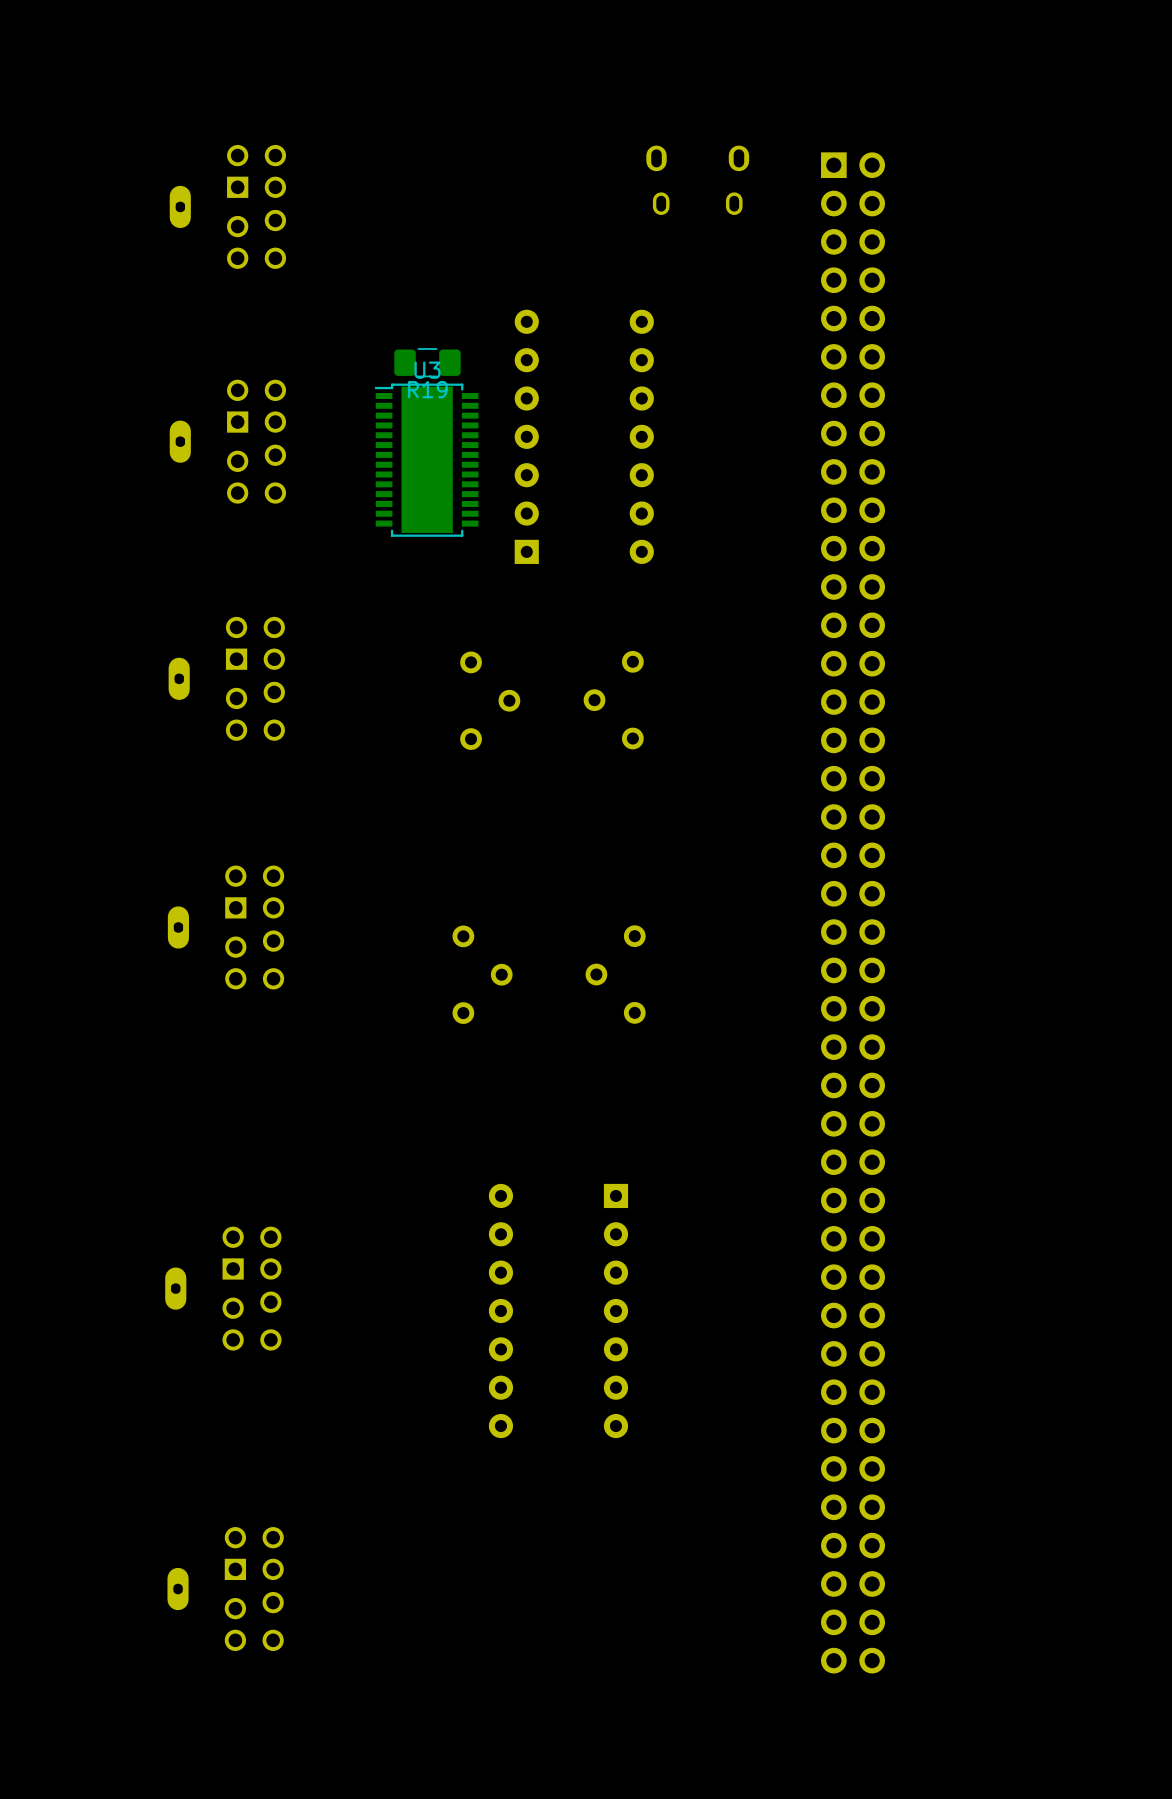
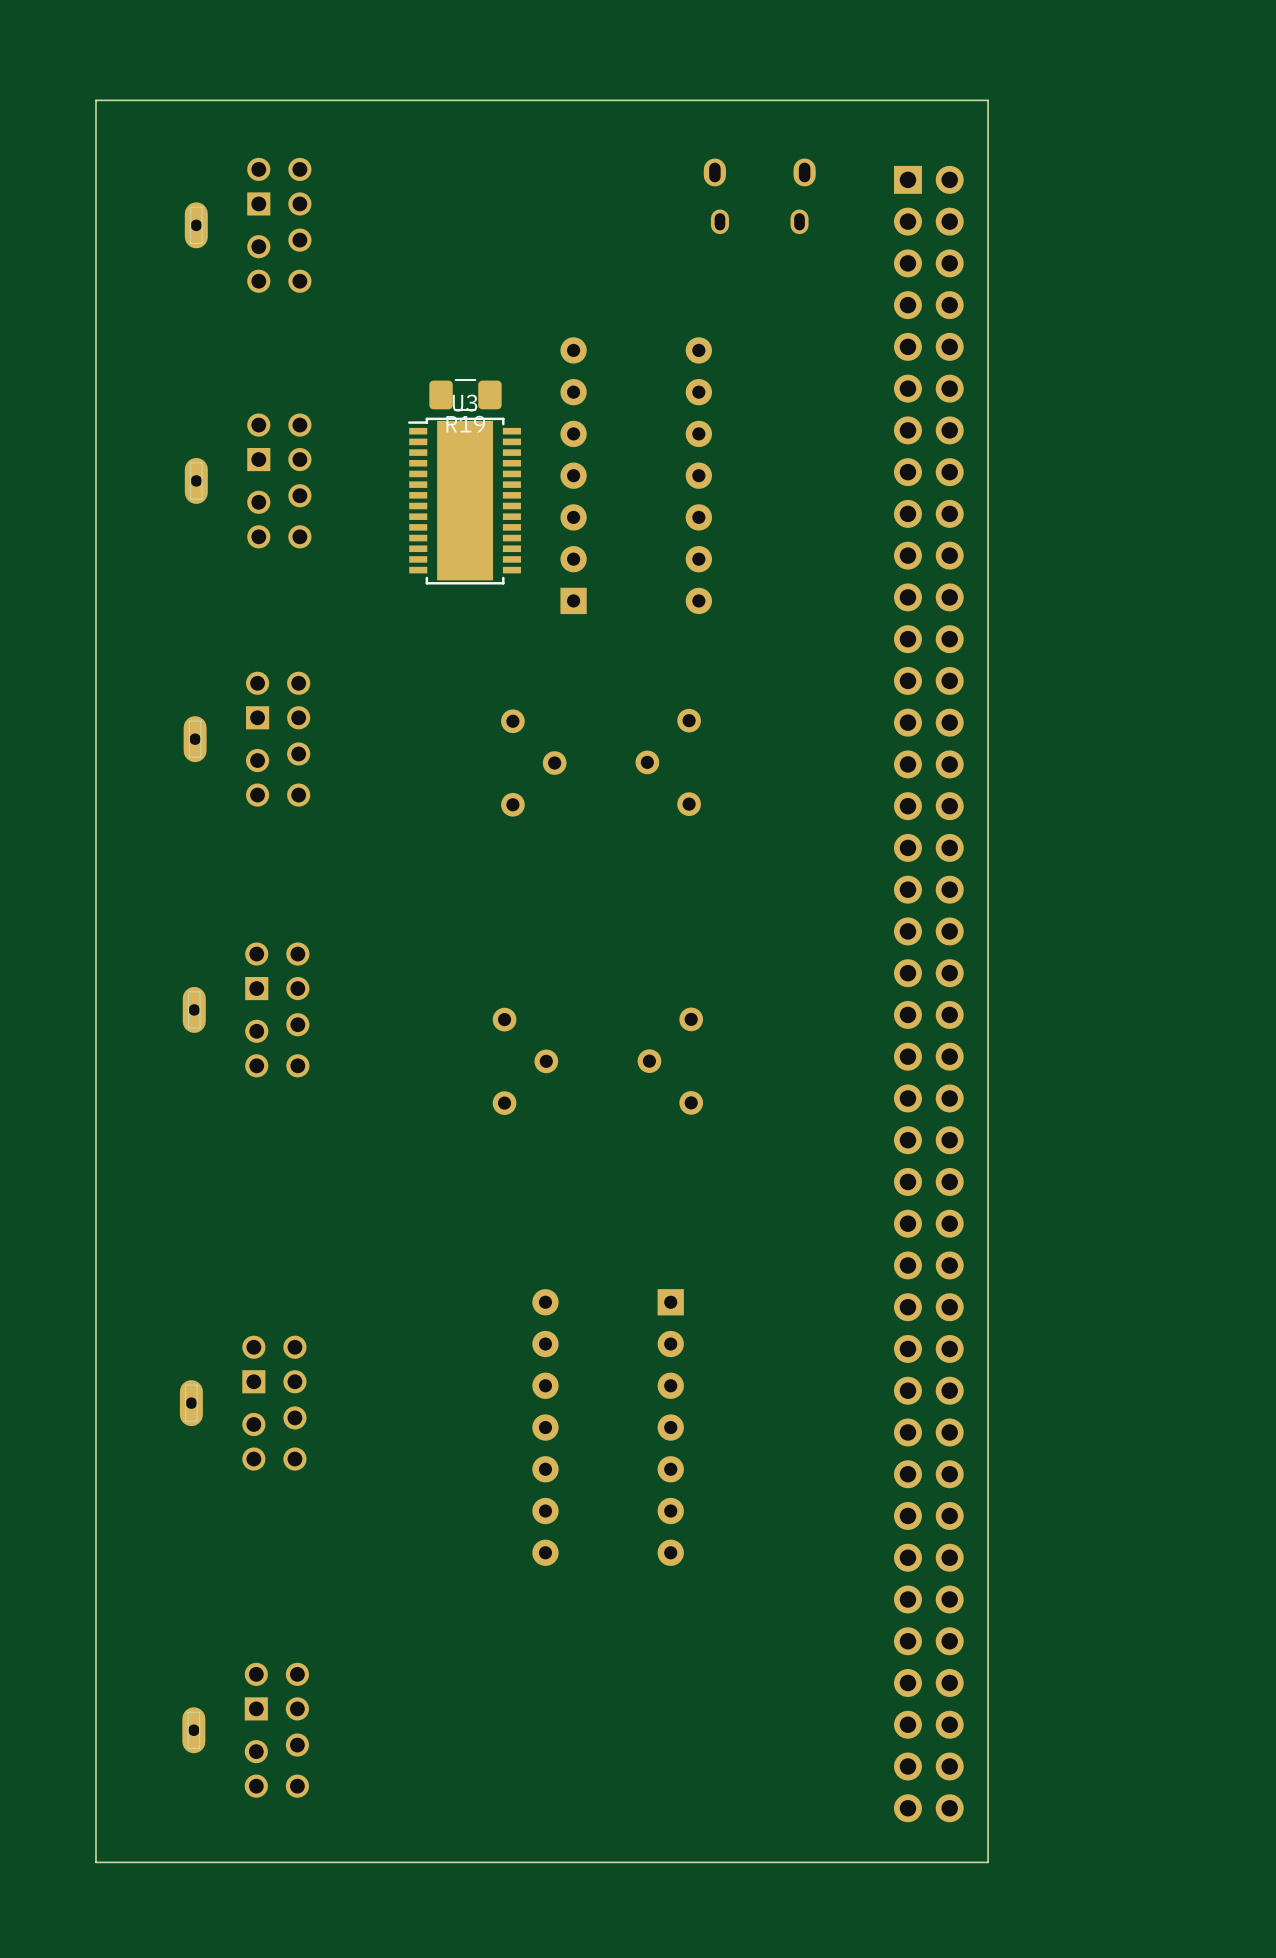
board edge: none -> (988, 100) (988, 1862) (96, 1862) (96, 100) (987, 100)

